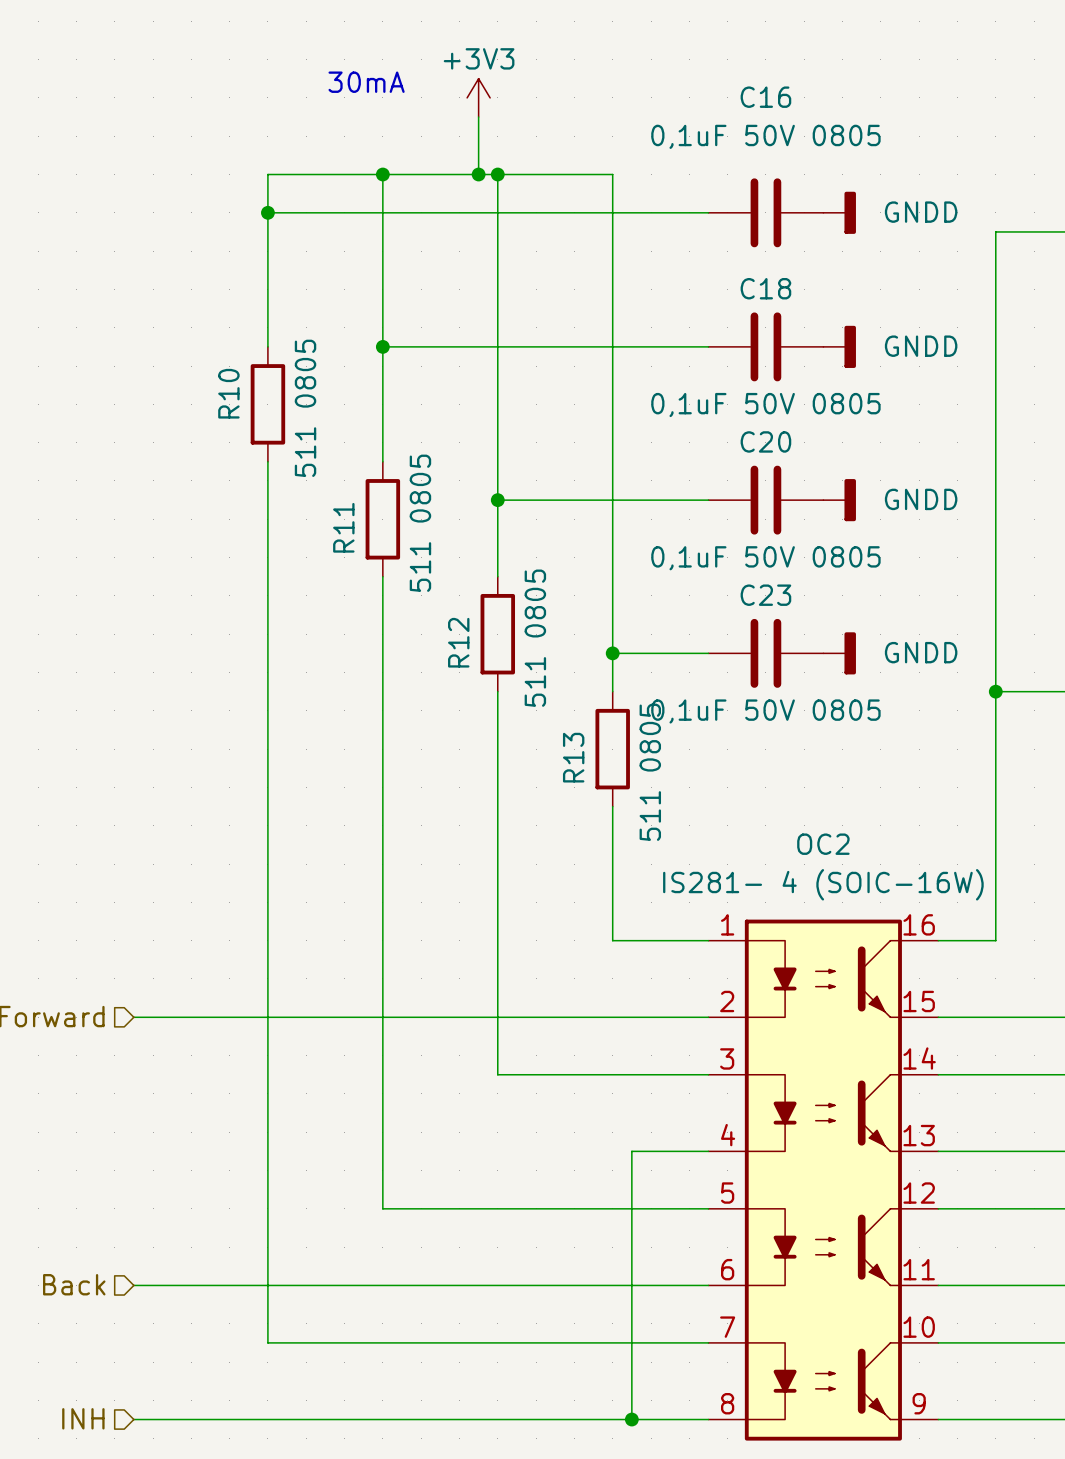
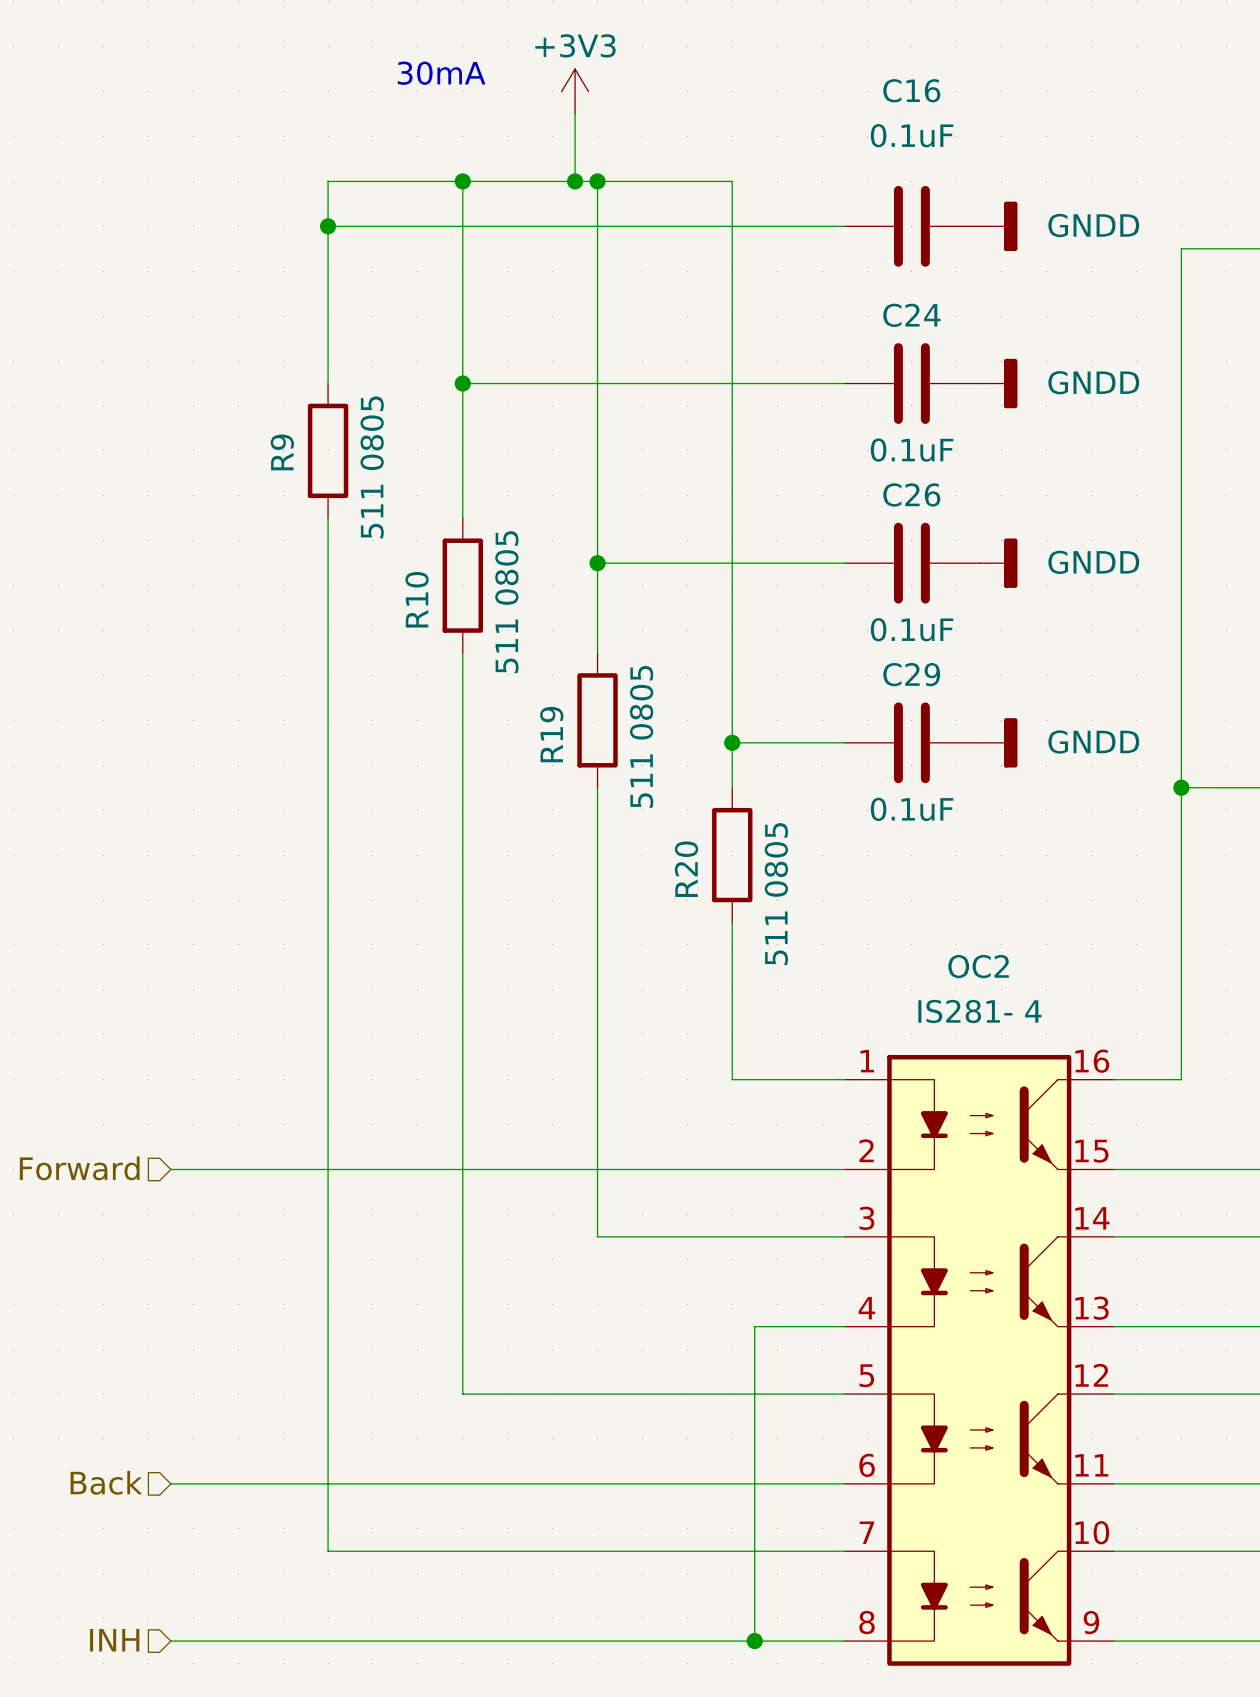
C16 value: 0,1uF 50V 0805 (765, 136) -> 0.1uF (912, 135)
C18 name: C18 (765, 288) -> C24 (911, 315)
R10 name: R10 (228, 393) -> R9 (282, 452)
C18 value: 0,1uF 50V 0805 (765, 405) -> 0.1uF (912, 450)
C20 name: C20 (765, 441) -> C26 (911, 494)
R11 name: R11 (343, 527) -> R10 (417, 599)
C20 value: 0,1uF 50V 0805 (765, 558) -> 0.1uF (912, 629)
C23 name: C23 (765, 595) -> C29 (911, 674)
R12 name: R12 (458, 642) -> R19 (551, 734)
C23 value: 0,1uF 50V 0805 (765, 711) -> 0.1uF (912, 809)
R13 name: R13 (573, 757) -> R20 (686, 869)
OC2 value: IS281- 4 (SOIC-16W) (823, 884) -> IS281- 4 (979, 1011)

